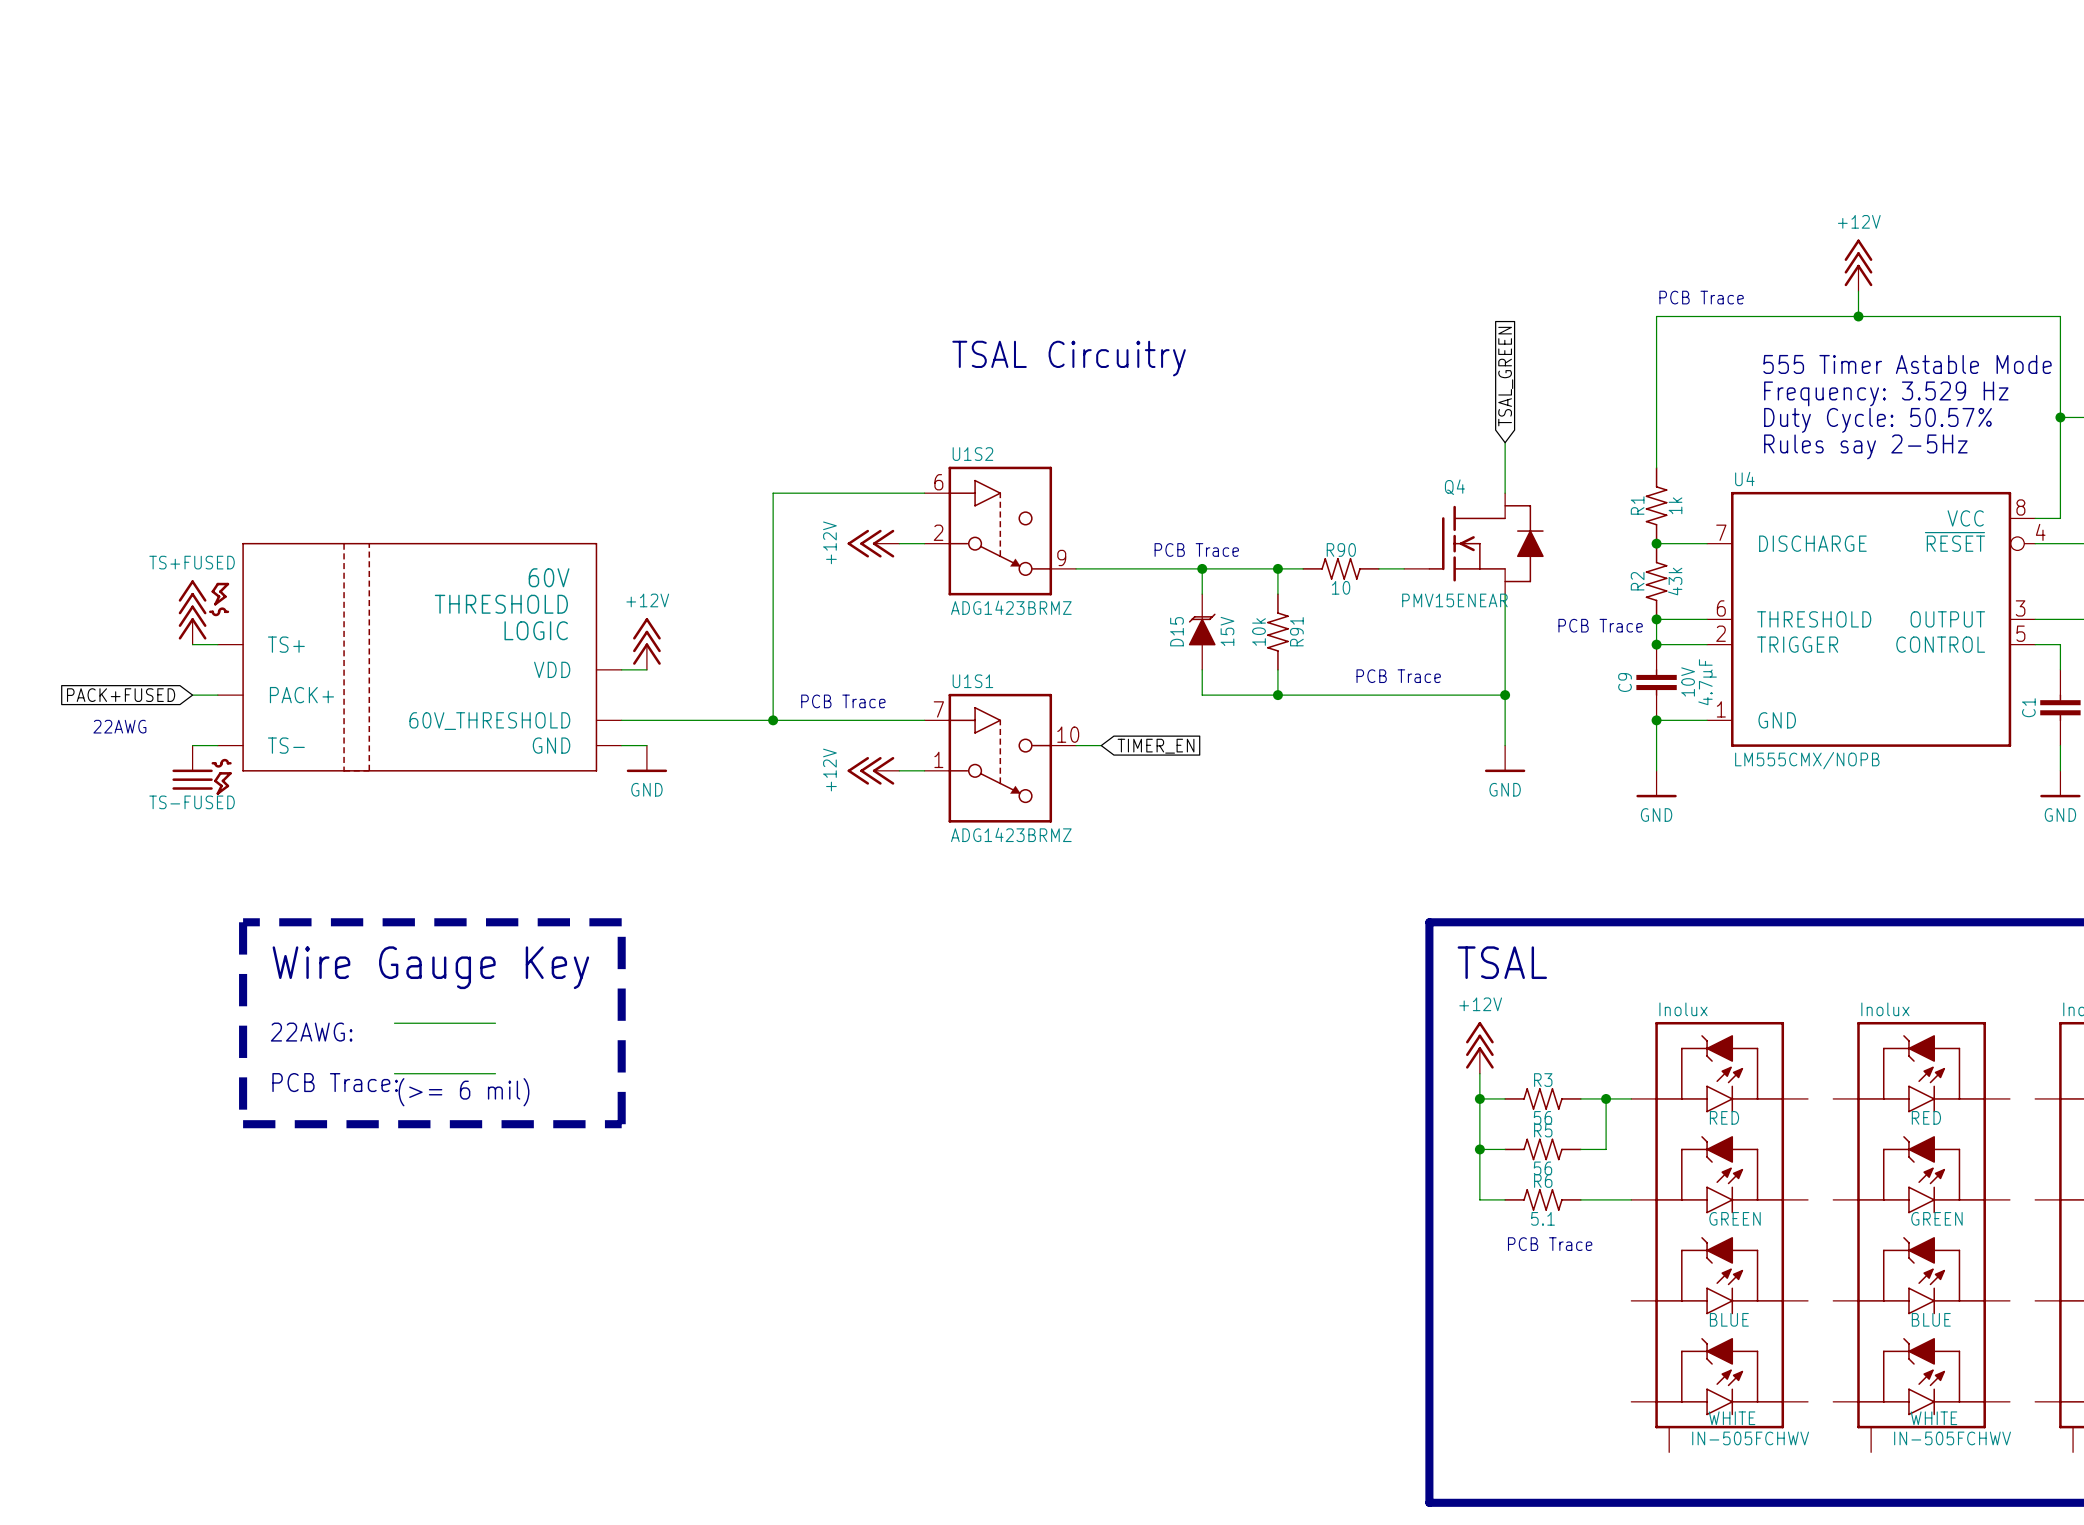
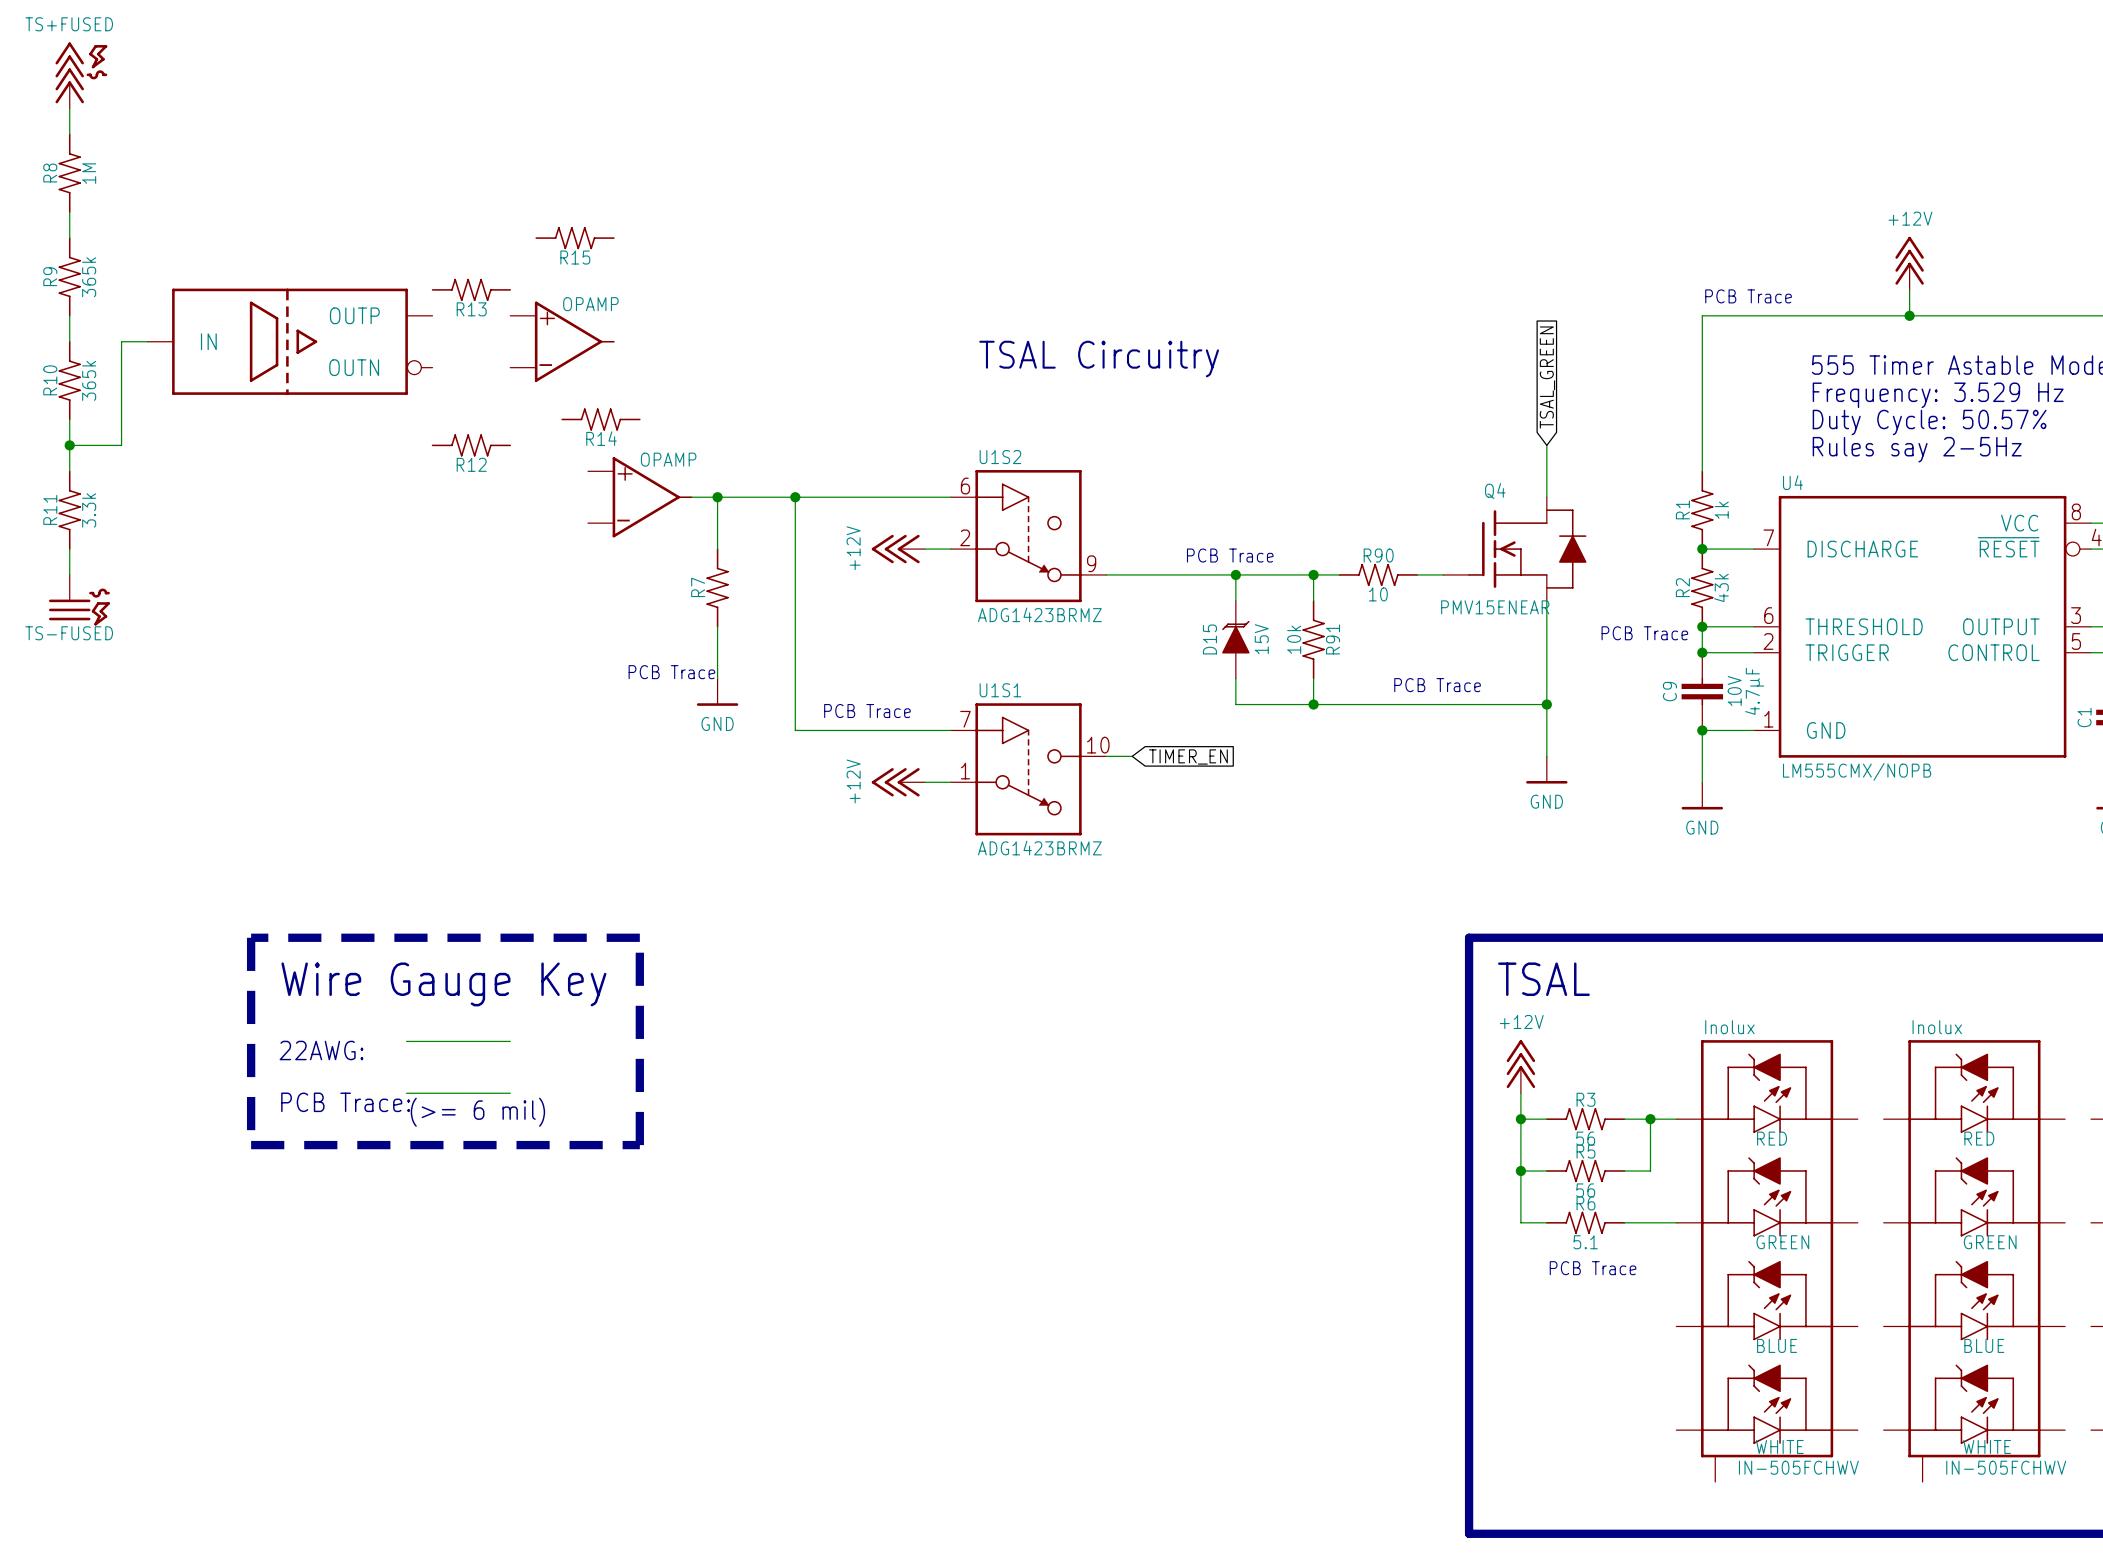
power symbol: none -> TS+FUSED (81, 75)
wire: none -> (69, 108) (69, 134)
R8: none -> 1M (69, 173)
wire: none -> (69, 212) (69, 238)
R15: none -> (575, 238)
R9: none -> 365k (69, 276)
R13: none -> (471, 289)
wire: none -> (69, 315) (69, 341)
wire: none -> (147, 341) (121, 341) (121, 445) (69, 445)
part: none -> (289, 341)
part: none -> (562, 341)
R10: none -> 365k (69, 380)
wire: none -> (69, 419) (69, 471)
R14: none -> (600, 419)
junction: none -> (69, 445)
R12: none -> (471, 445)
part: none -> (640, 497)
wire: none -> (691, 497) (795, 497)
wire: none -> (717, 497) (717, 549)
junction: none -> (717, 497)
junction: none -> (795, 497)
R11: none -> 3.3k (69, 510)
wire: none -> (69, 549) (69, 574)
R7: none -> (717, 587)
power symbol: TS+FUSED (203, 612) -> none
wire: none -> (717, 626) (717, 678)
wire: (192, 644) (217, 644) -> none
power symbol: +12V (646, 644) -> none
part: (419, 657) -> none
text: none -> PCB Trace (671, 672)
wire: (621, 669) (646, 669) -> none
global label: PACK+FUSED (121, 695) -> none
wire: (192, 695) (217, 695) -> none
wire: (621, 720) (773, 720) -> none
junction: (773, 720) -> none
text: 22AWG (119, 726) -> none
wire: (192, 745) (217, 745) -> none
wire: (621, 745) (646, 745) -> none
power symbol position: GND (646, 758) -> GND (717, 692)
power symbol position: TS-FUSED (202, 770) -> TS-FUSED (79, 600)

